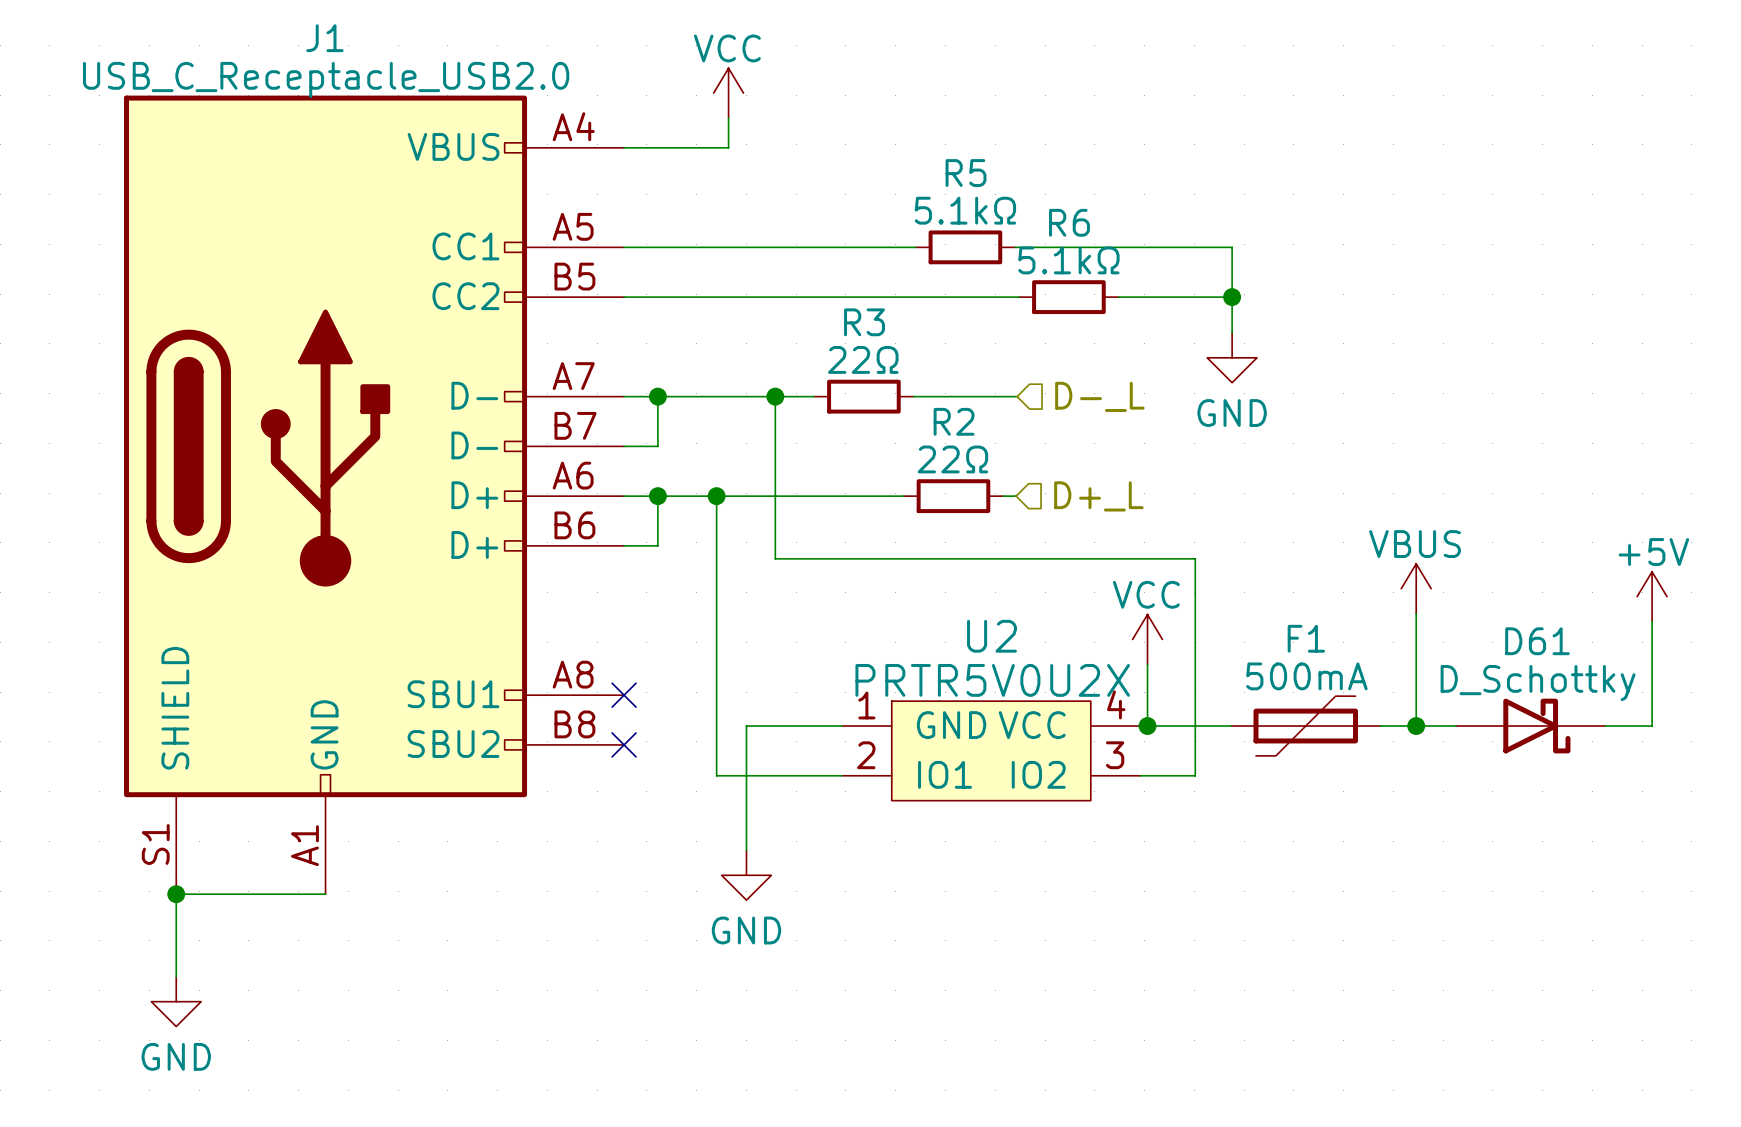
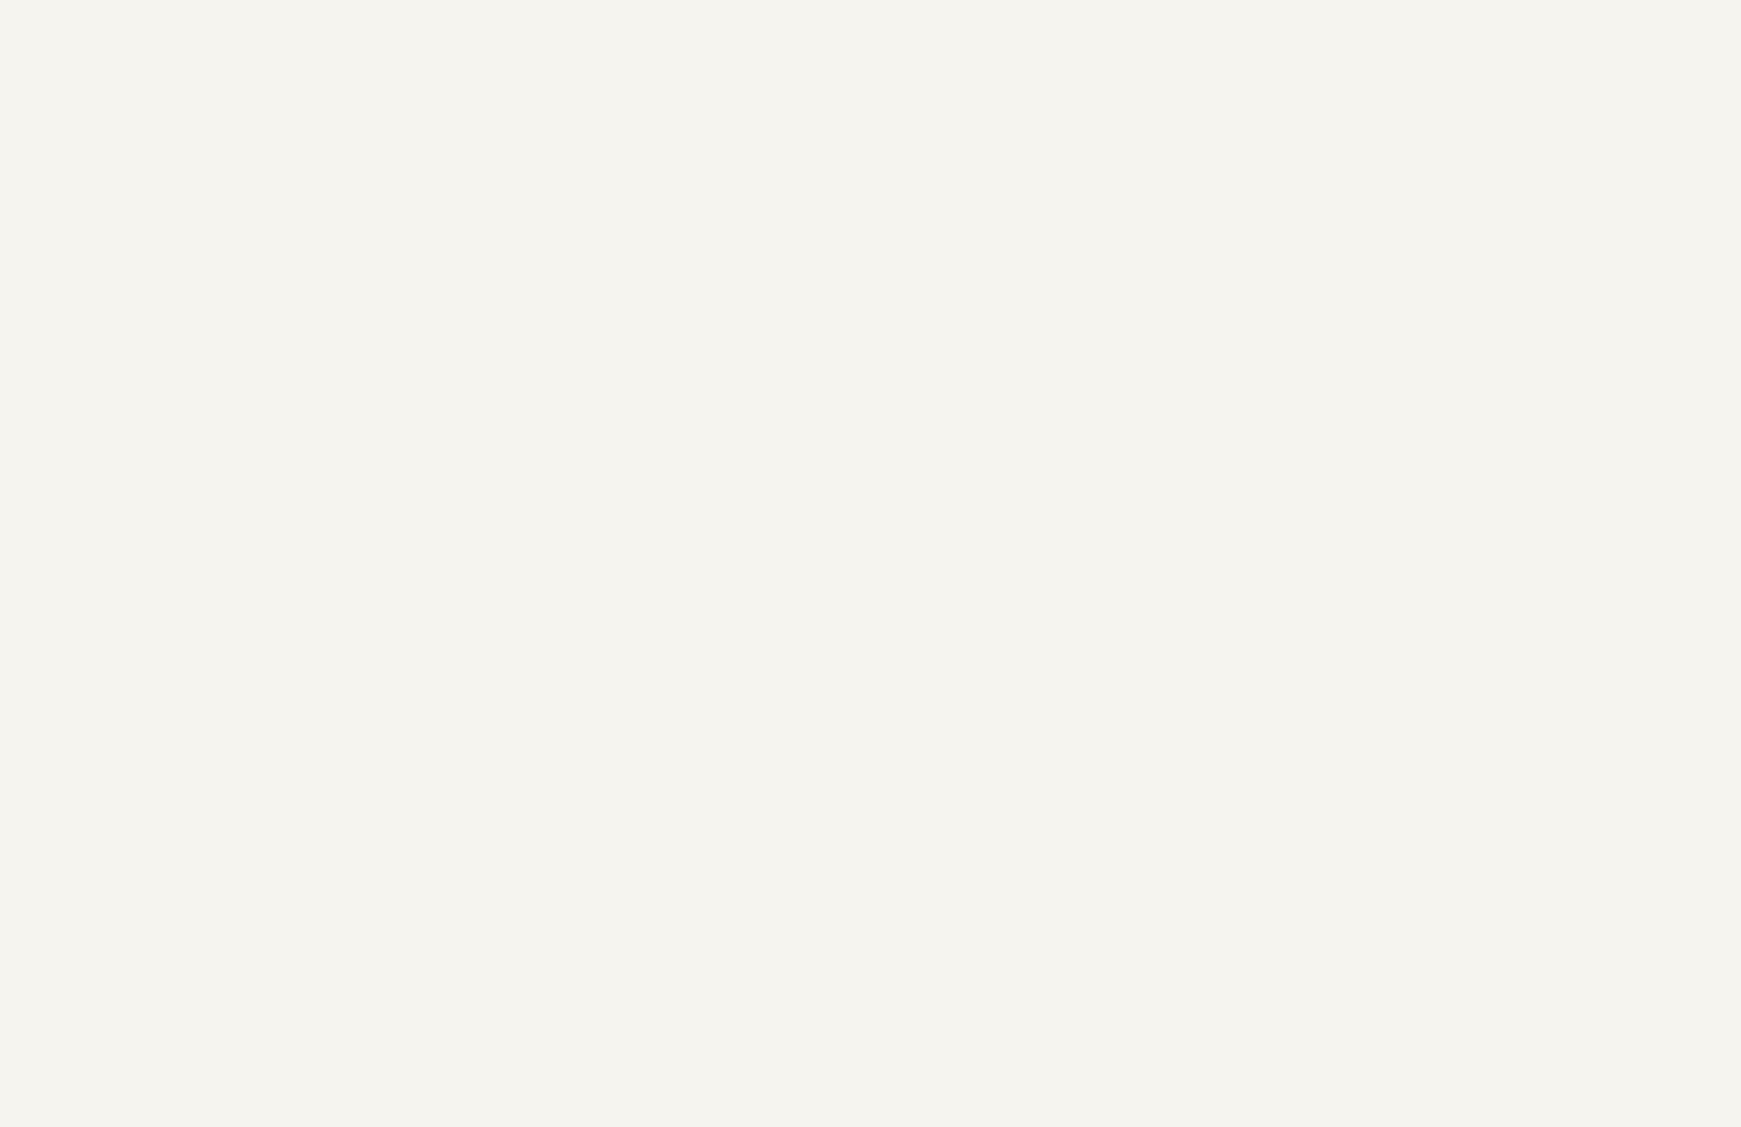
power symbol: VCC (728, 93) -> none
wire: (728, 117) (728, 147) (624, 147) -> none
wire: (624, 247) (915, 247) -> none
R5: 5.1kΩ (965, 247) -> none
wire: (1015, 247) (1232, 247) (1232, 332) -> none
wire: (624, 297) (1019, 297) -> none
R6: 5.1kΩ (1068, 297) -> none
wire: (1118, 297) (1232, 297) -> none
junction: (1232, 297) -> none
power symbol: GND (1232, 357) -> none
wire: (624, 396) (814, 396) -> none
wire: (657, 396) (657, 446) (624, 446) -> none
junction: (657, 396) -> none
wire: (775, 396) (775, 558) (1195, 558) (1195, 775) (1140, 775) -> none
junction: (775, 396) -> none
R3: 22Ω (863, 396) -> none
wire: (913, 396) (1017, 396) -> none
hierarchical label: D-_L (1099, 396) -> none
J1: USB_C_Receptacle_USB2.0 (374, 494) -> none
wire: (1017, 495) (1003, 496) -> none
wire: (624, 496) (903, 496) -> none
wire: (657, 496) (657, 545) (624, 545) -> none
junction: (657, 496) -> none
wire: (716, 496) (716, 775) (842, 775) -> none
junction: (716, 496) -> none
R2: 22Ω (953, 496) -> none
hierarchical label: D+_L (1098, 496) -> none
power symbol: VBUS (1416, 588) -> none
power symbol: +5V (1652, 596) -> none
wire: (1416, 613) (1416, 726) -> none
wire: (1652, 621) (1652, 726) (1605, 726) -> none
power symbol: VCC (1147, 639) -> none
wire: (1147, 664) (1147, 726) -> none
no-connect mark: (624, 695) -> none
wire: (842, 726) (746, 726) (746, 850) -> none
wire: (1140, 726) (1231, 726) -> none
junction: (1147, 726) -> none
F1: 500mA (1305, 726) -> none
wire: (1380, 726) (1456, 726) -> none
junction: (1416, 726) -> none
D61: D_Schottky (1530, 726) -> none
no-connect mark: (624, 744) -> none
U2: PRTR5V0U2X (991, 750) -> none
power symbol: GND (746, 875) -> none
junction: (176, 894) -> none
wire: (325, 894) (176, 894) (176, 976) -> none
power symbol: GND (176, 1001) -> none

